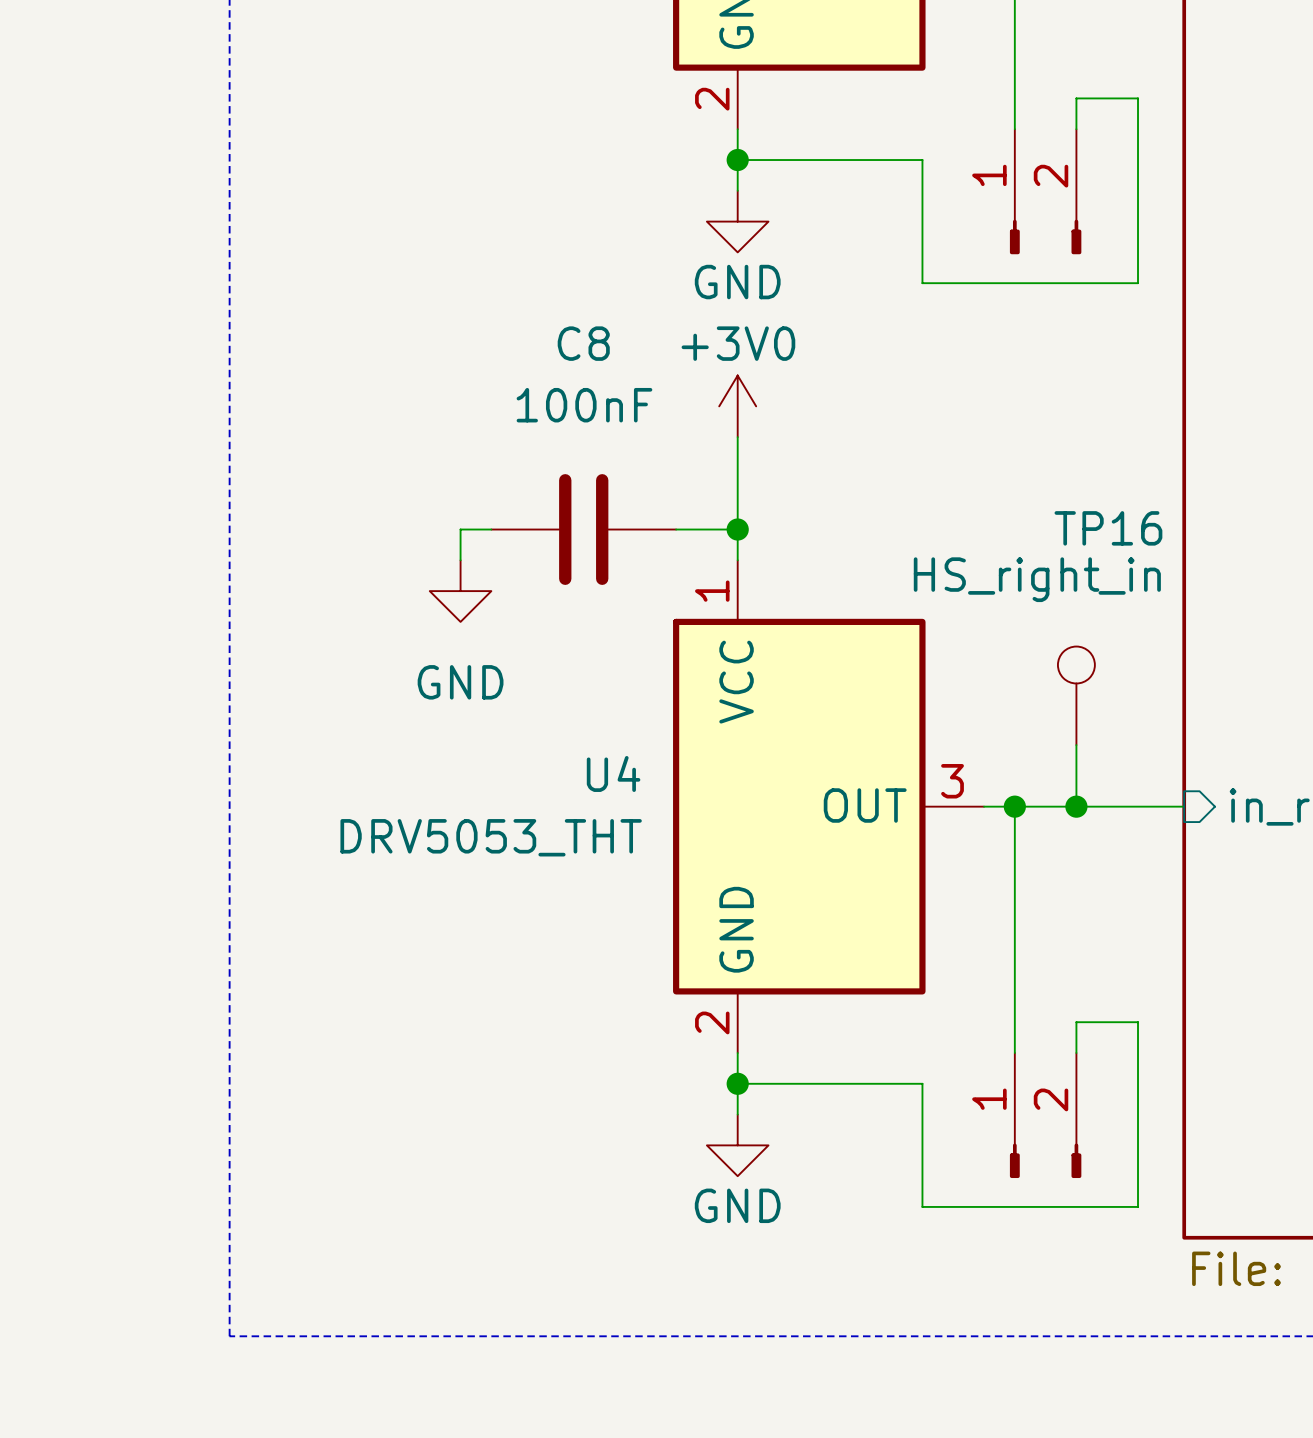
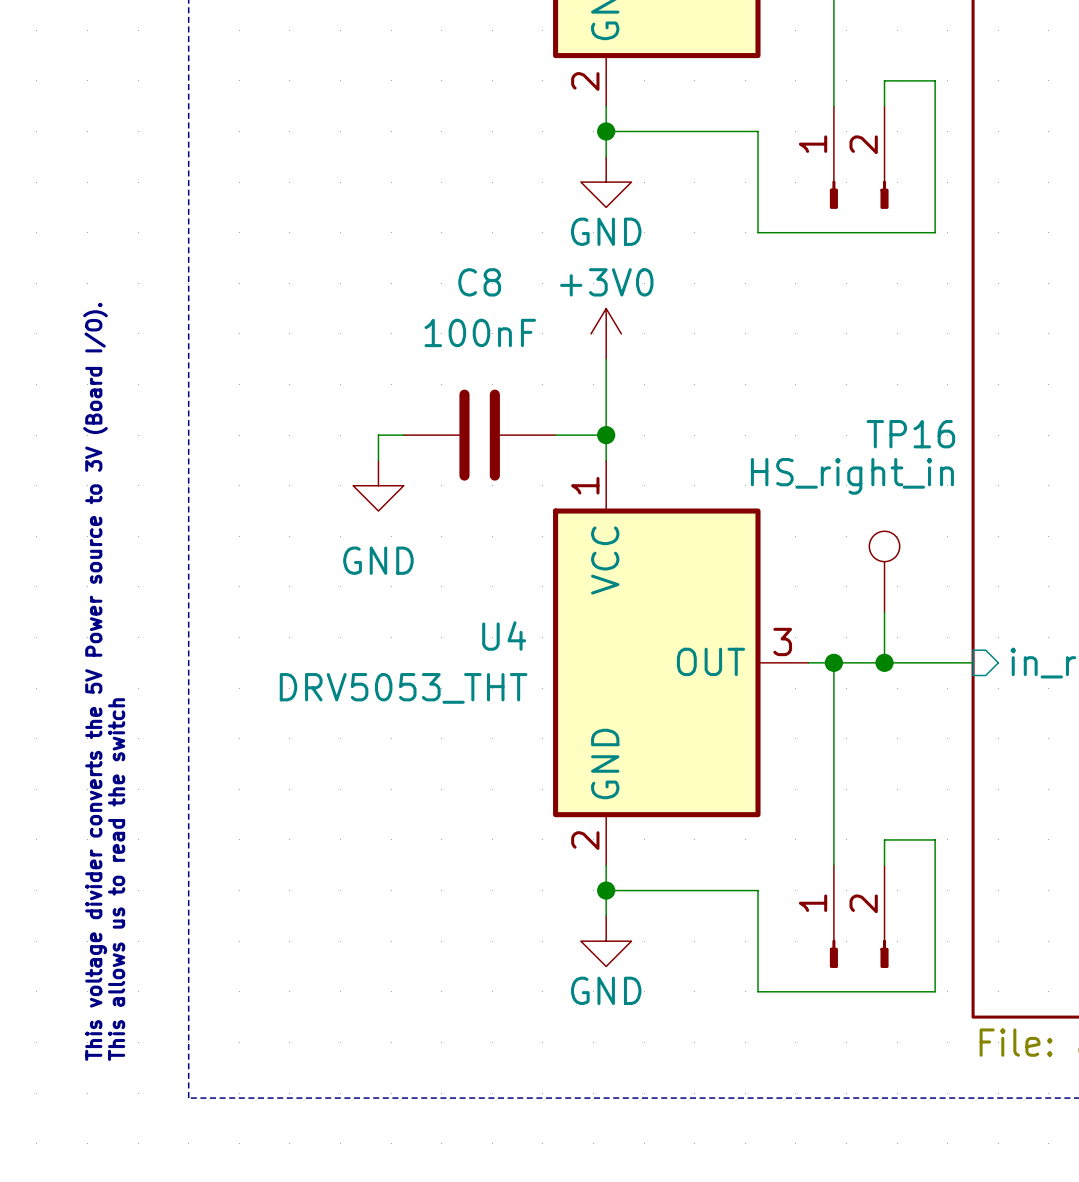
text: none -> This voltage divider converts the 5V Power source to 3V (Board I/O). (95, 681)
text: none -> This allows us to read the switch (116, 879)

